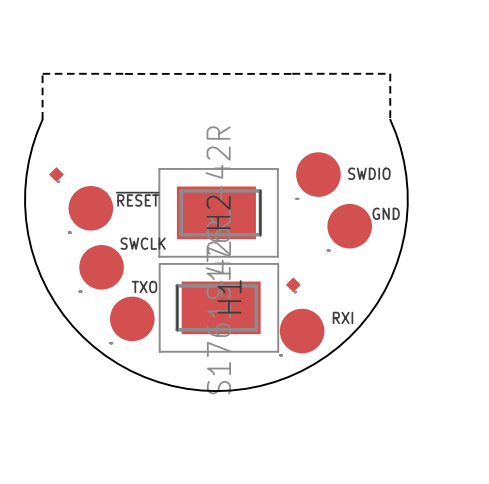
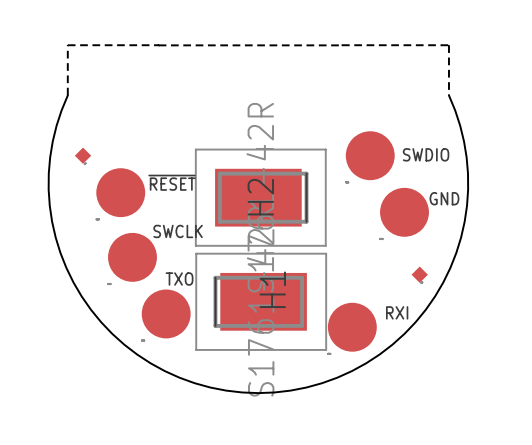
part position: (293, 284) -> (419, 274)

